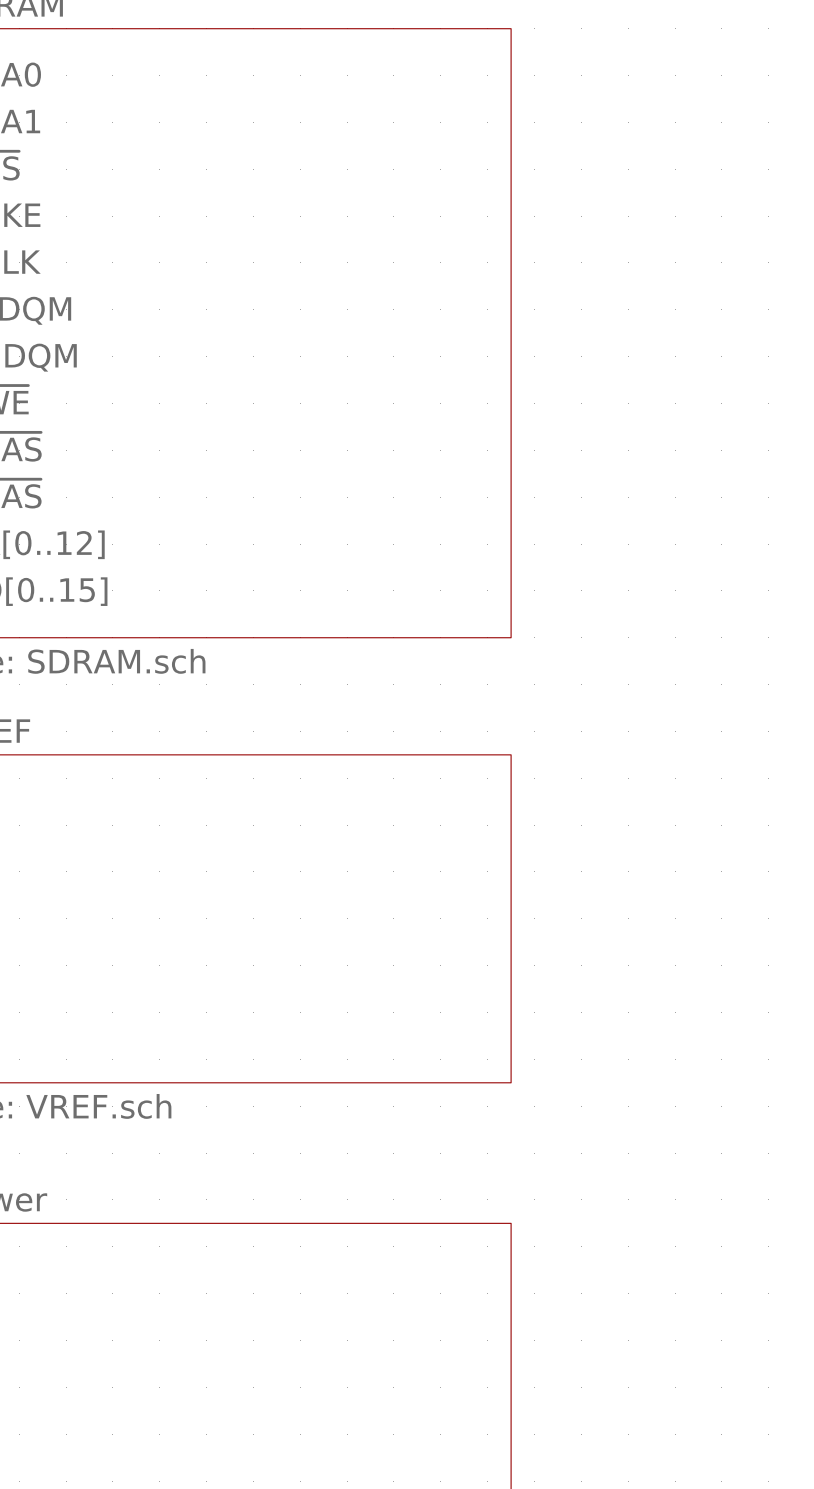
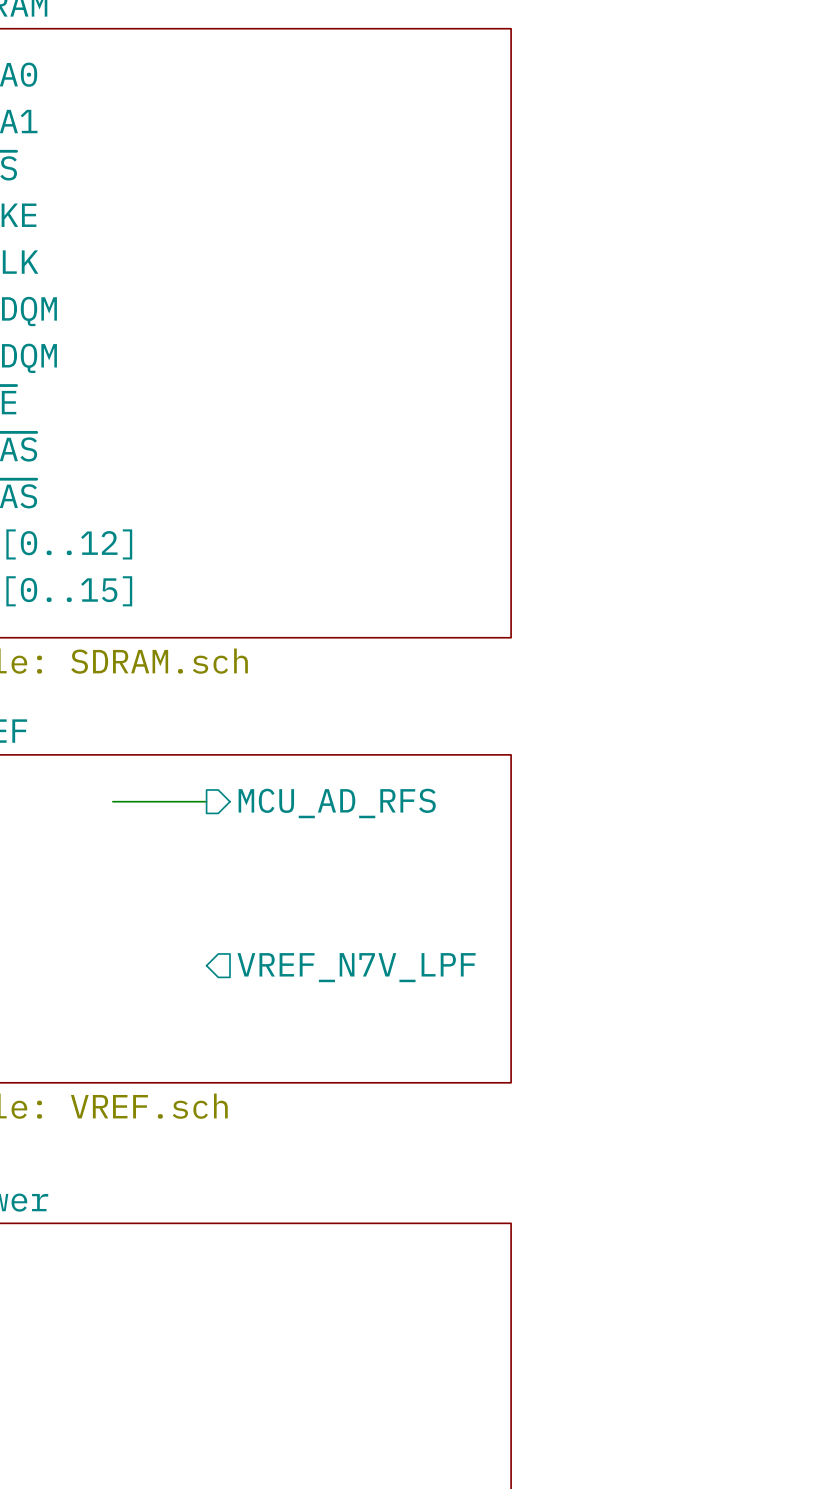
wire: none -> (112, 801) (206, 801)
sheet pin: none -> MCU_AD_RFS (337, 803)
sheet pin: none -> VREF_N7V_LPF (356, 967)

